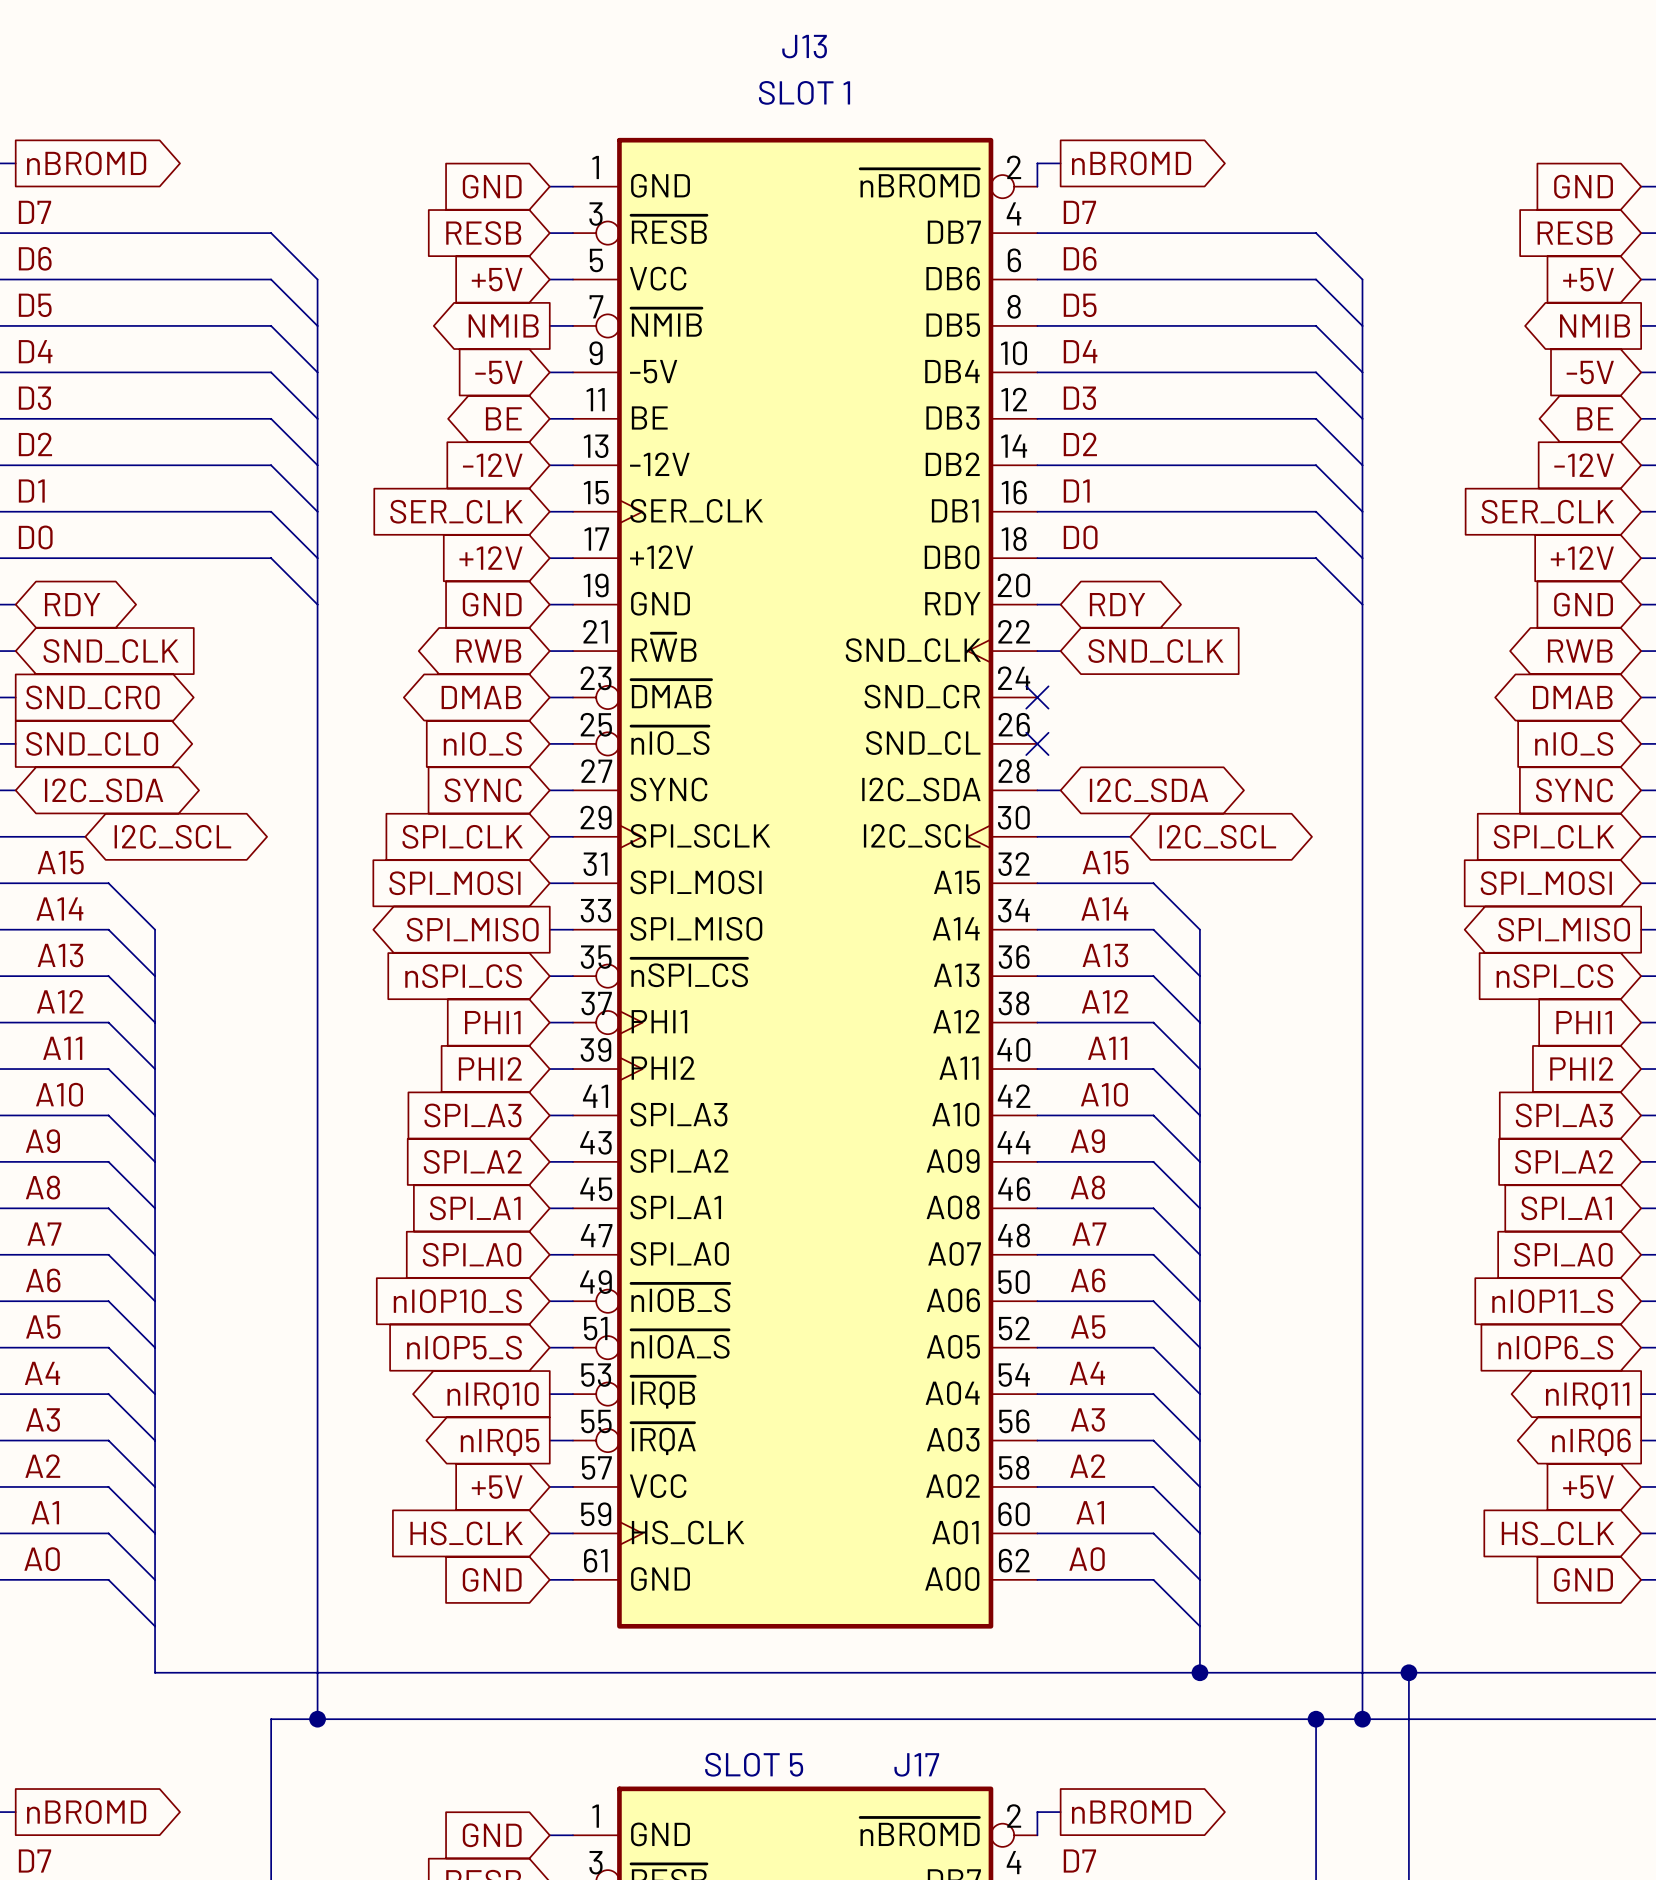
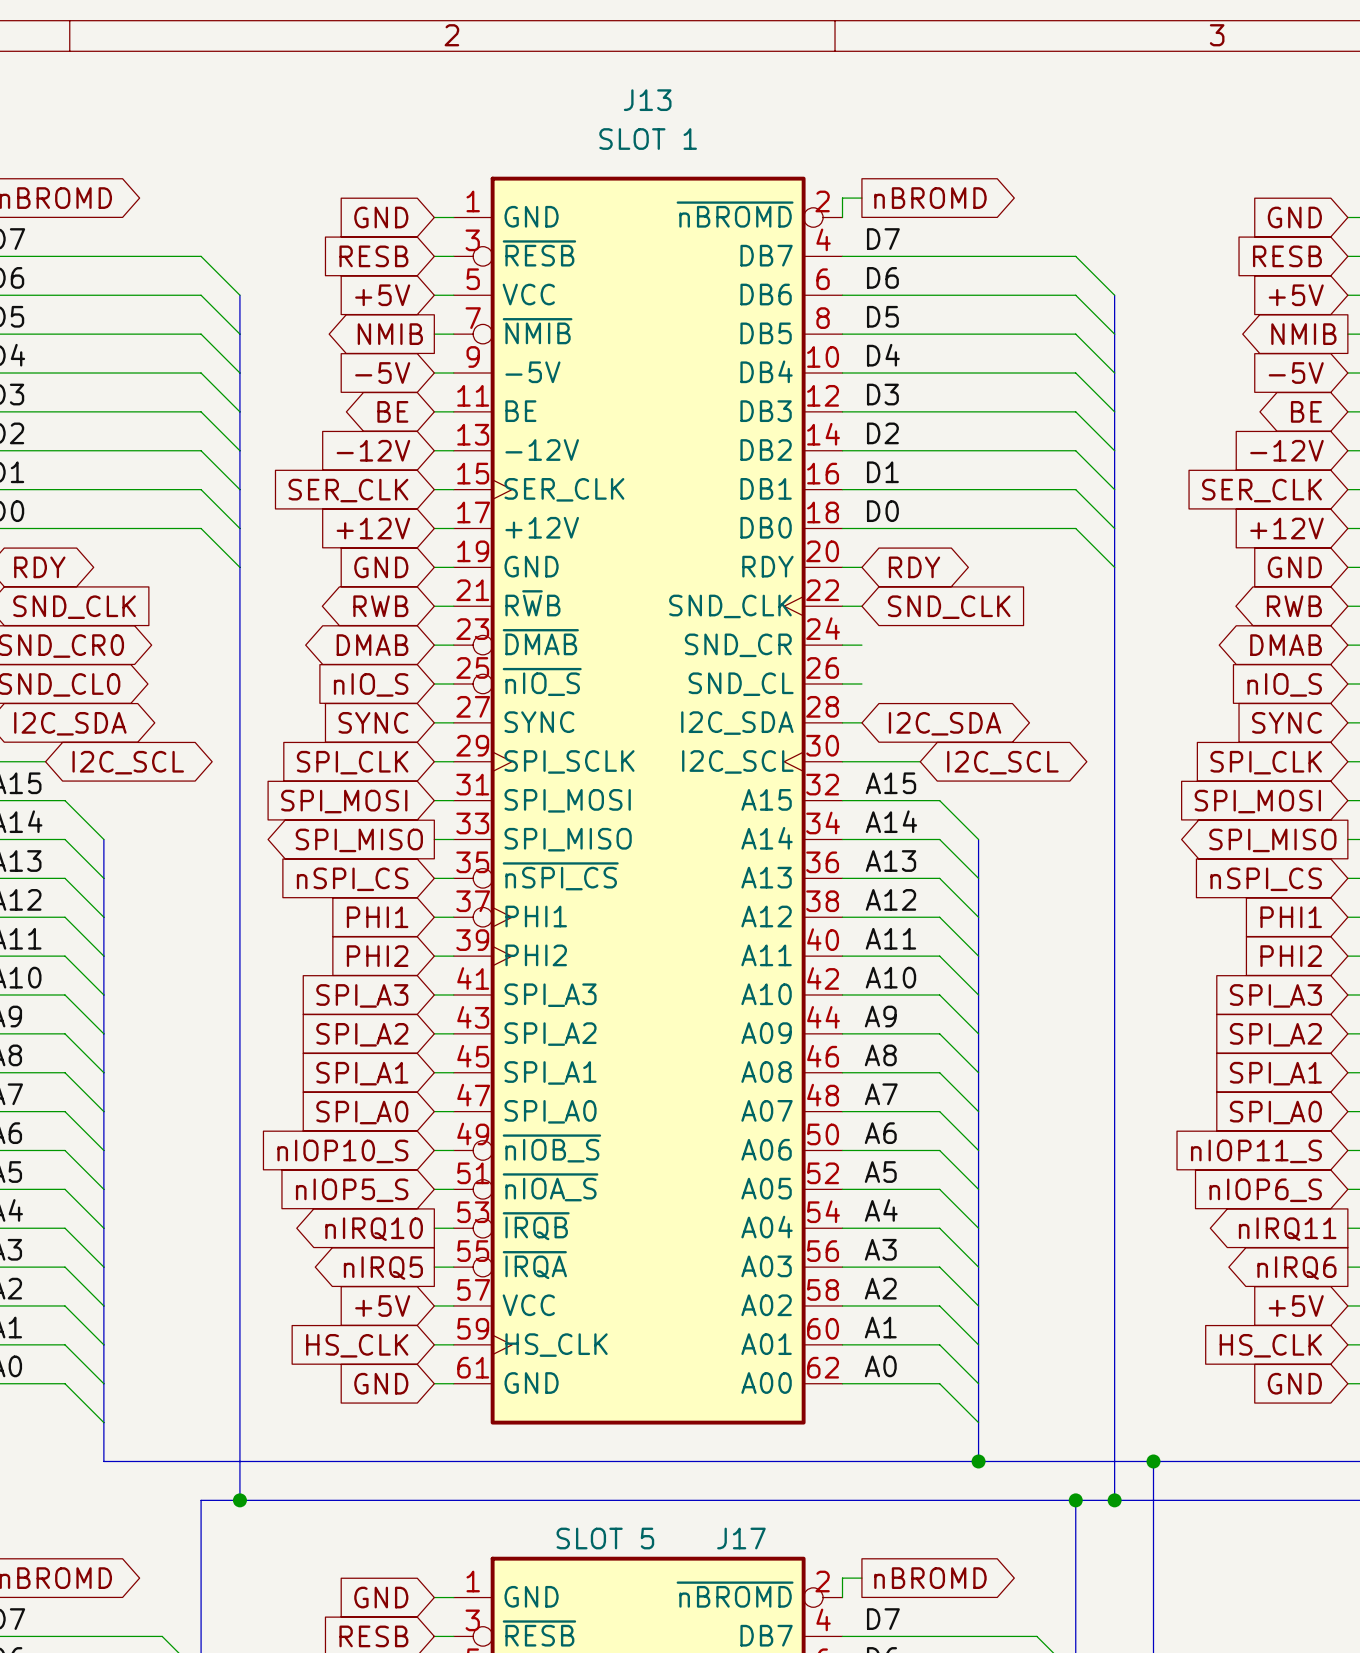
wire: none -> (842, 645) (861, 645)
no-connect mark: (1037, 697) -> none
wire: none -> (842, 683) (861, 683)
no-connect mark: (1037, 743) -> none

